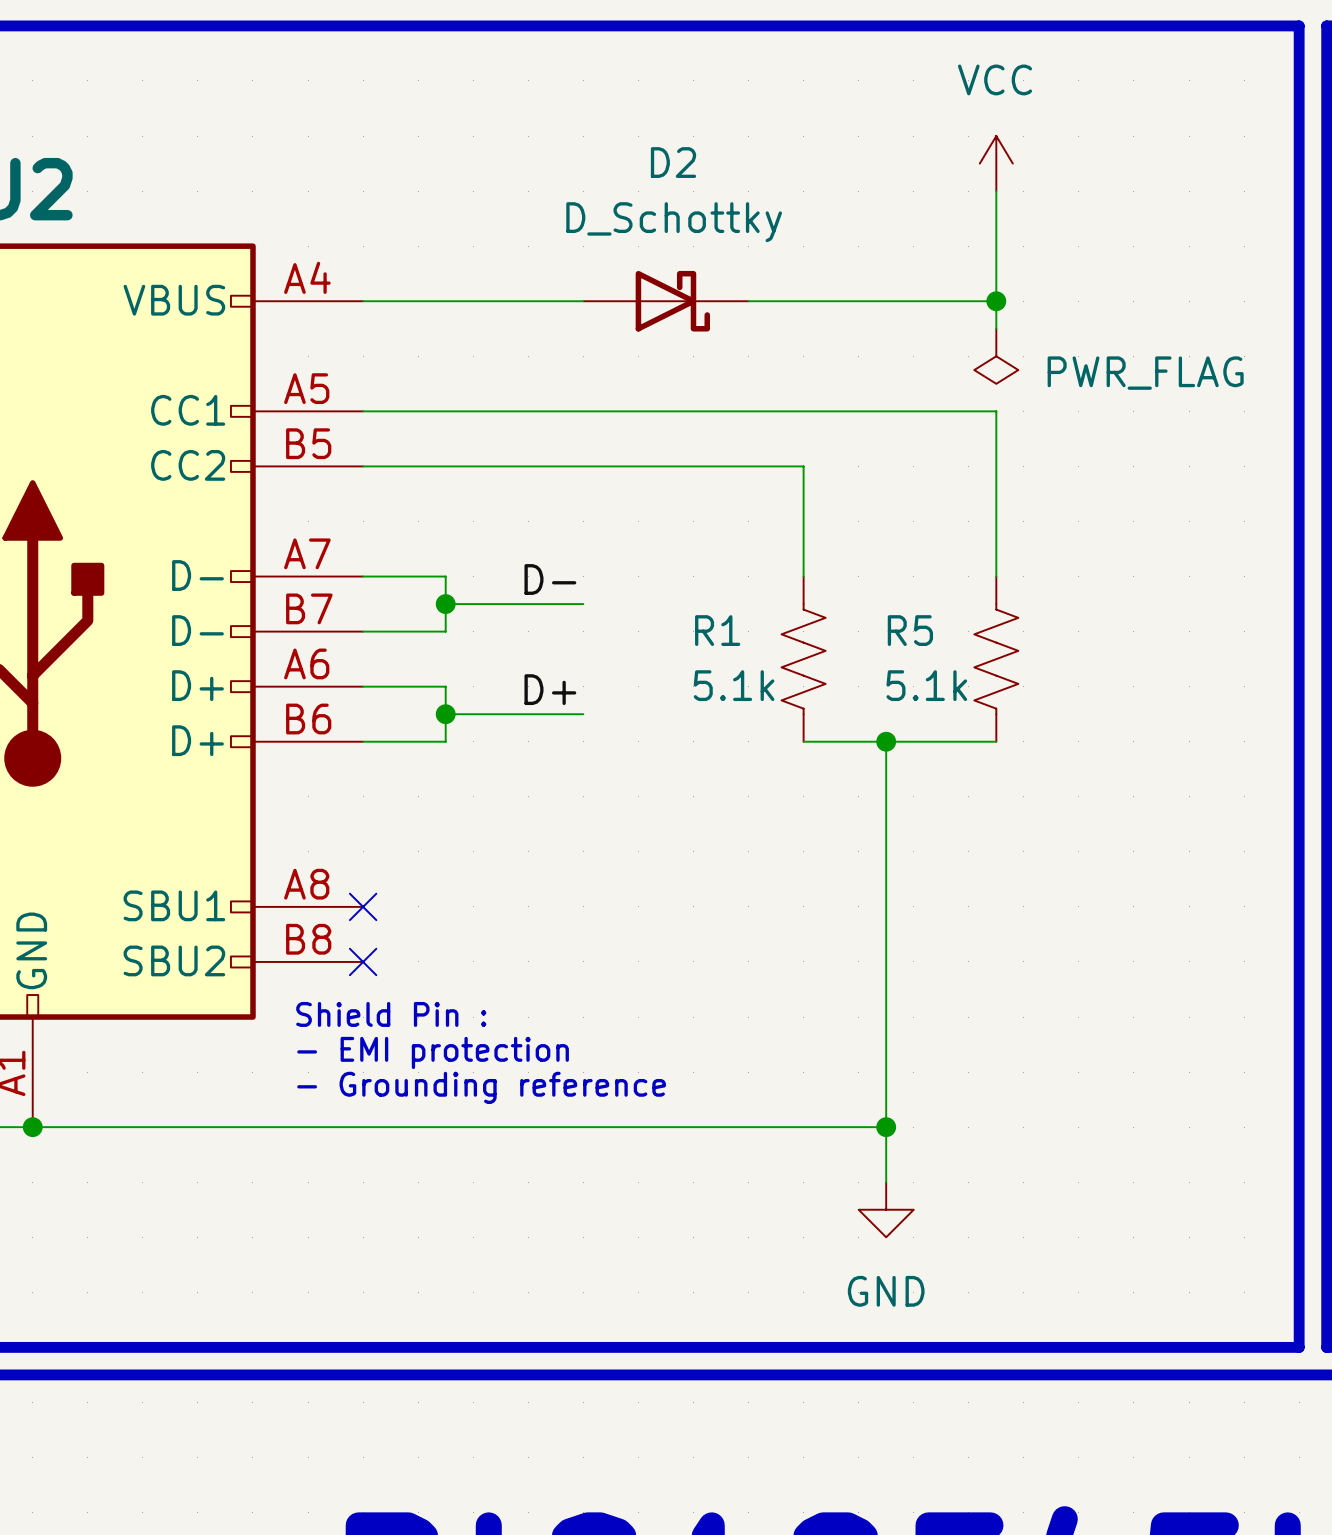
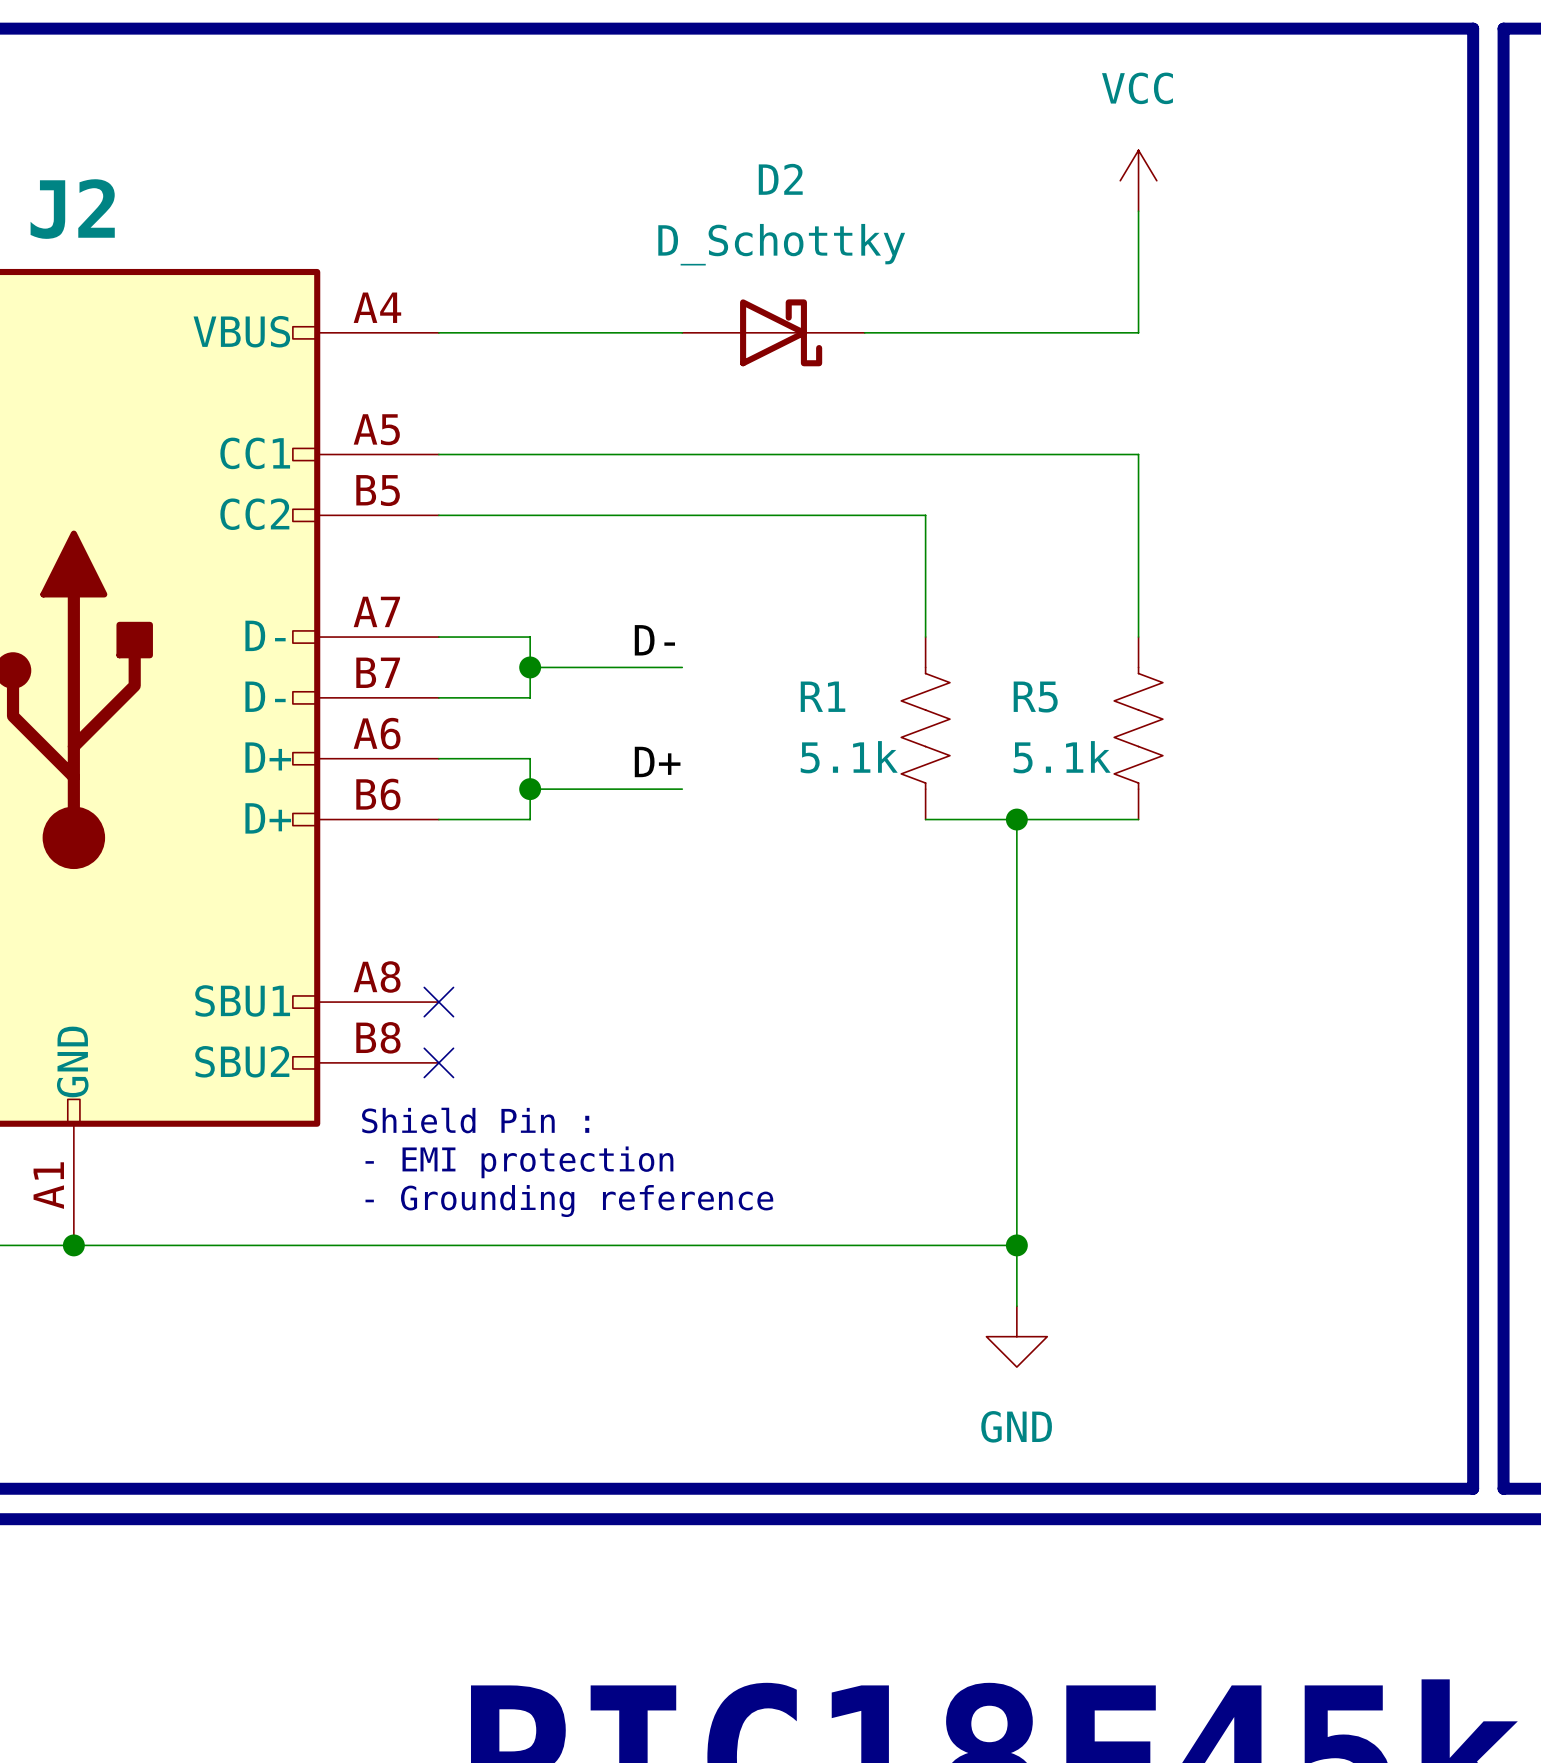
wire: (996, 301) (996, 328) -> none
junction: (996, 301) -> none
power symbol: PWR_FLAG (996, 356) -> none

